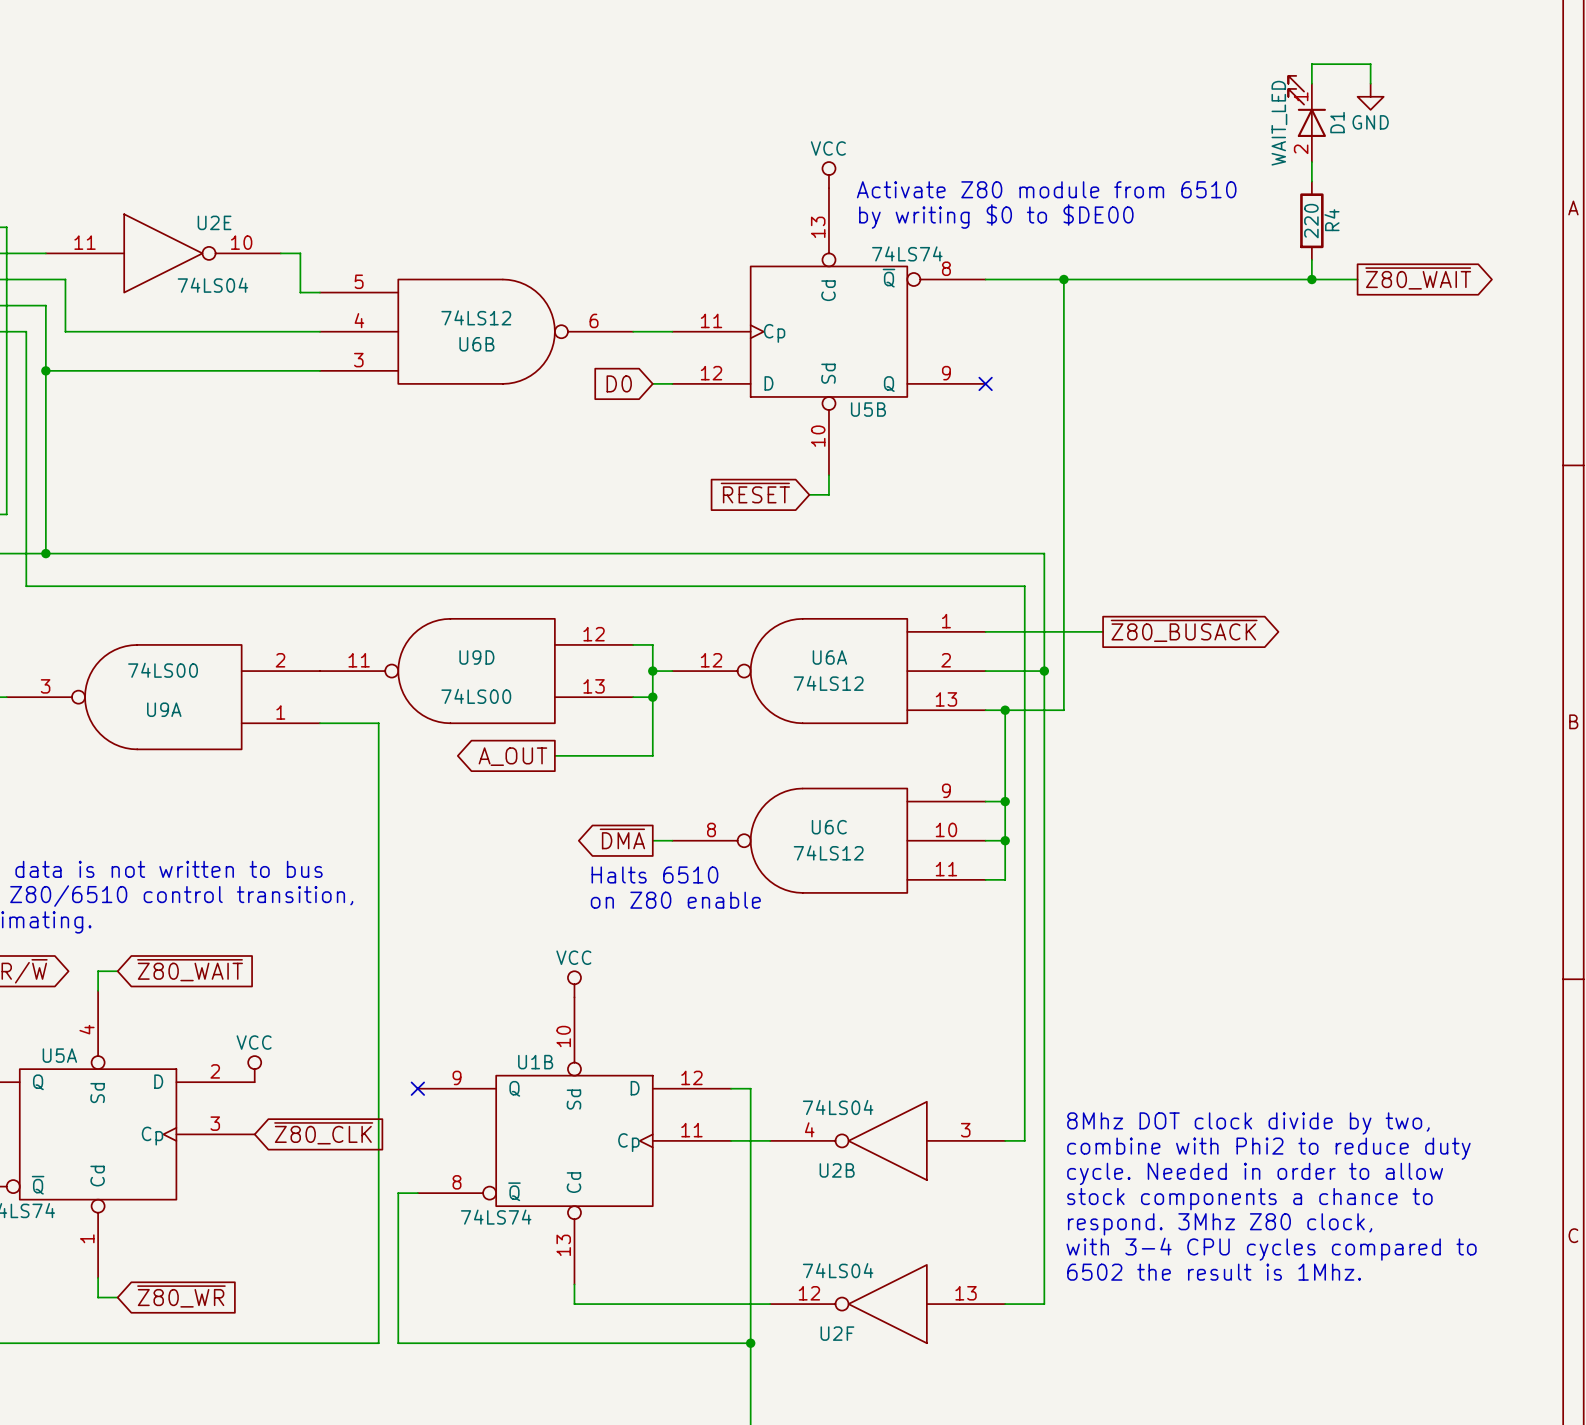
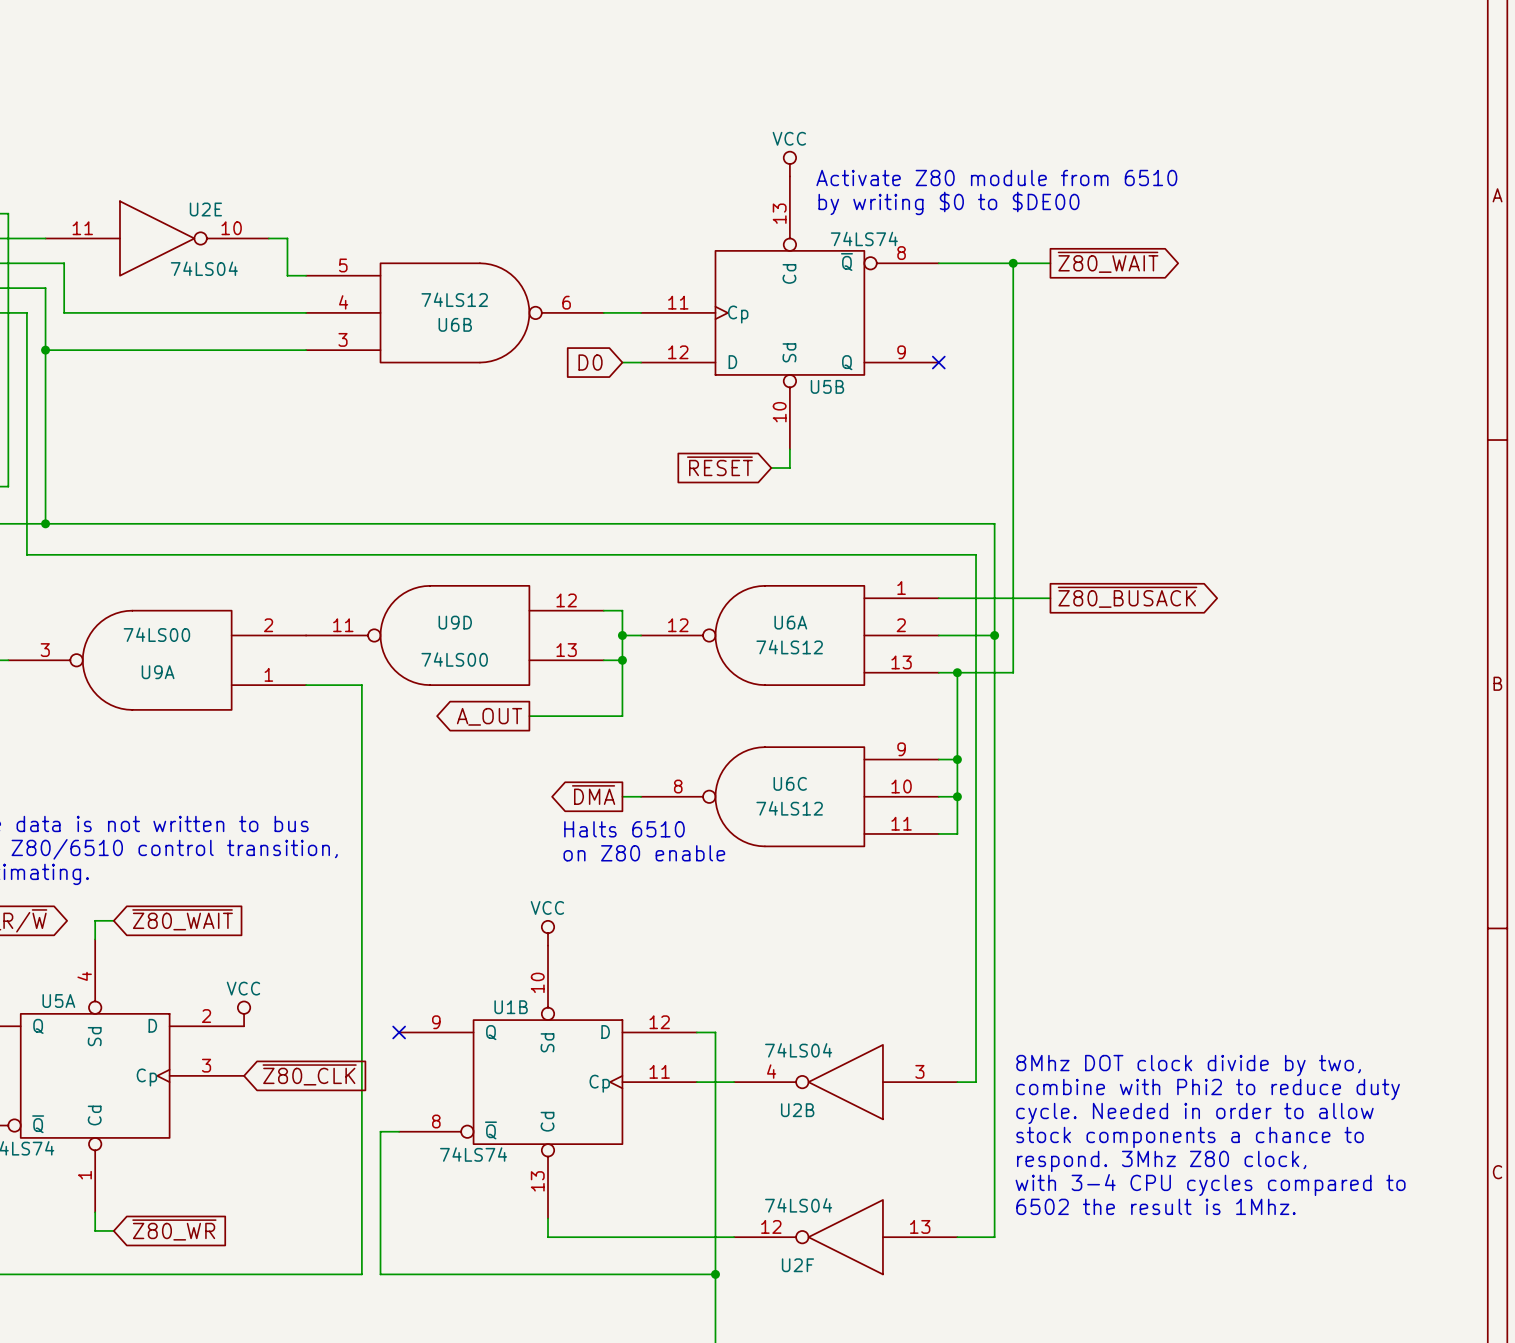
wire: (1311, 83) (1311, 64) (1370, 64) (1370, 83) -> none
power symbol: GND (1370, 96) -> none
D1: WAIT_LED (1307, 118) -> none
wire: (1311, 162) (1311, 181) -> none
R4: 220 (1311, 220) -> none
wire: (1311, 259) (1311, 279) -> none
global label position: ~{Z80_WAIT} (1418, 278) -> ~{Z80_WAIT} (1108, 262)
wire: (1103, 279) (1357, 279) -> none
junction: (1311, 279) -> none

